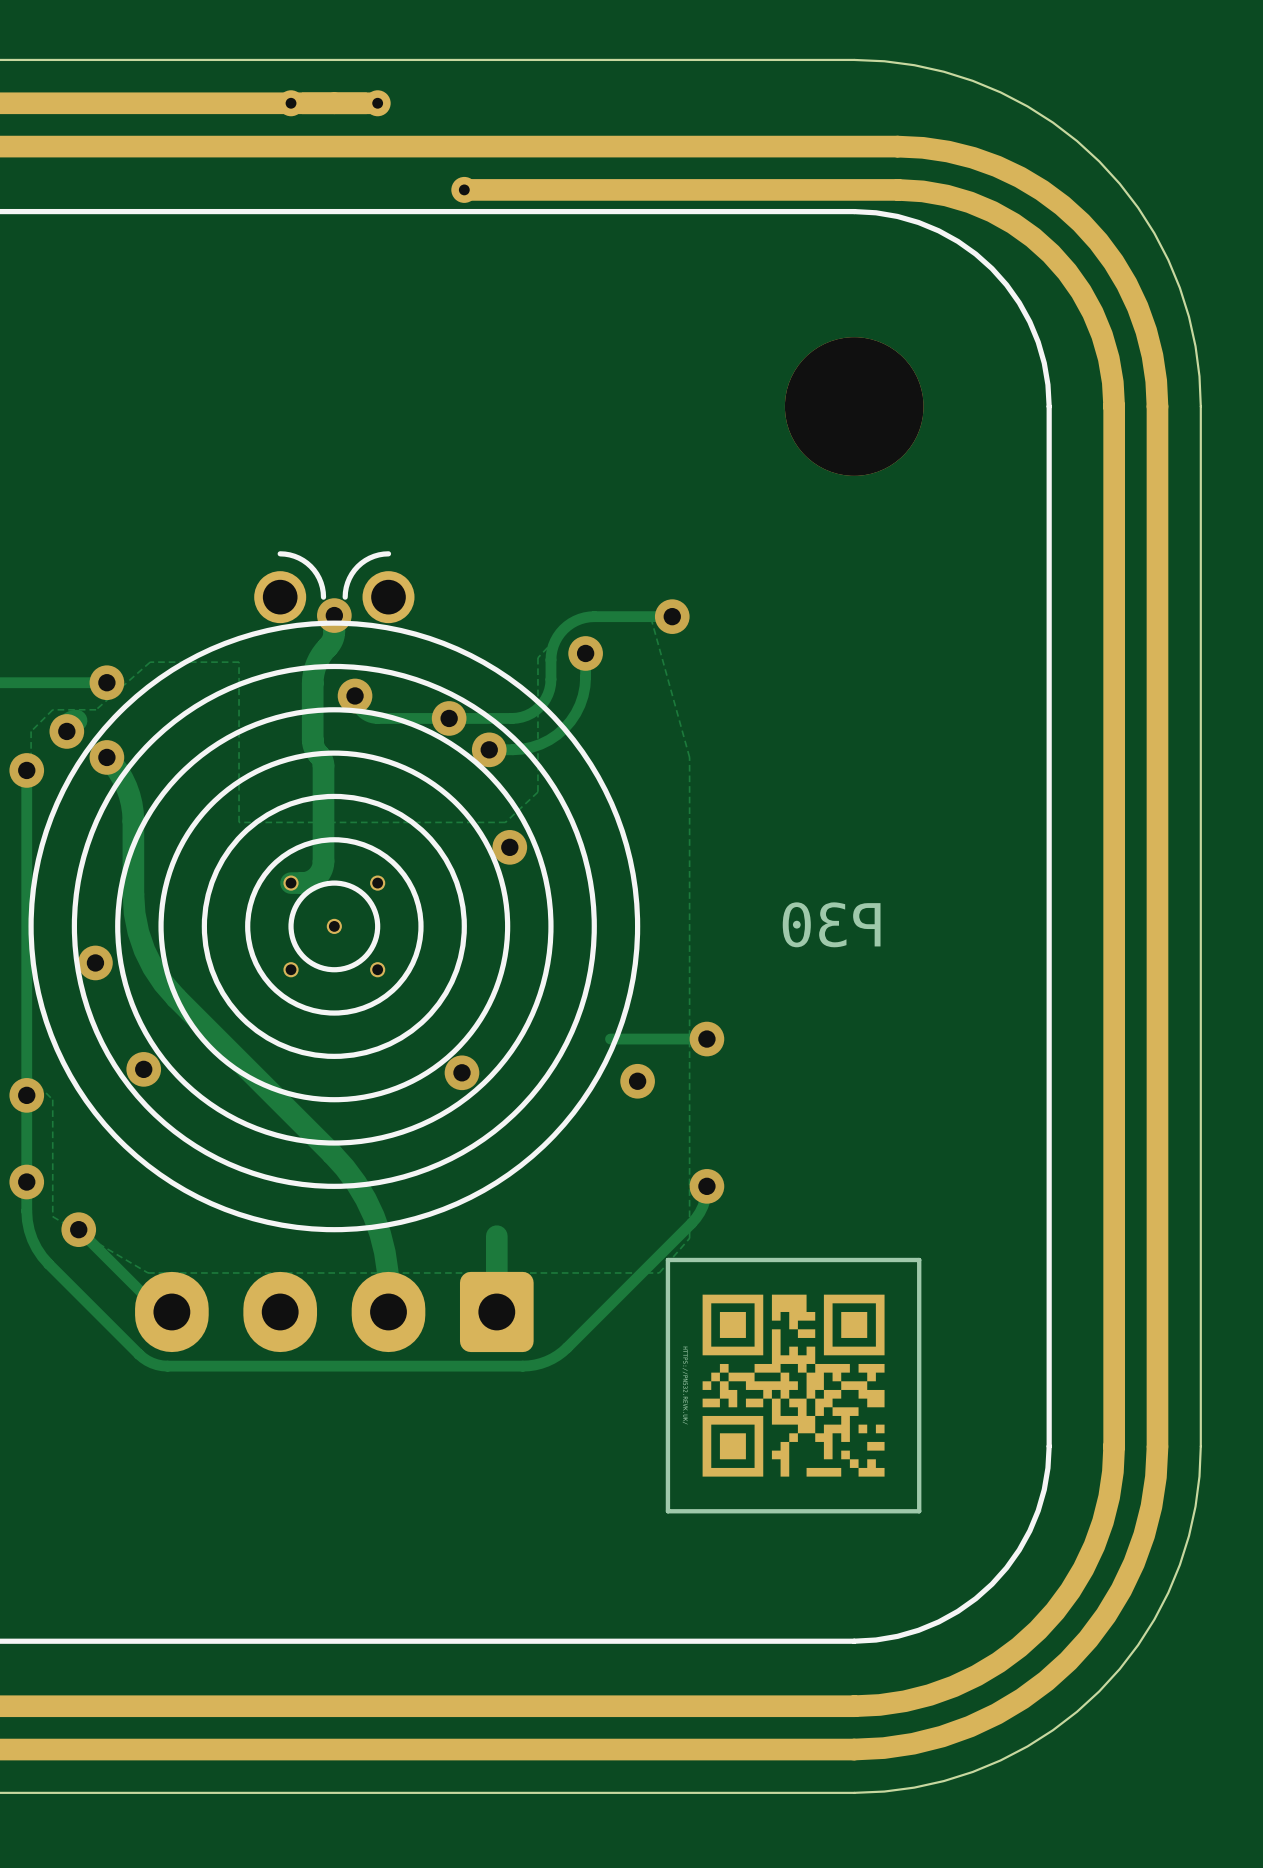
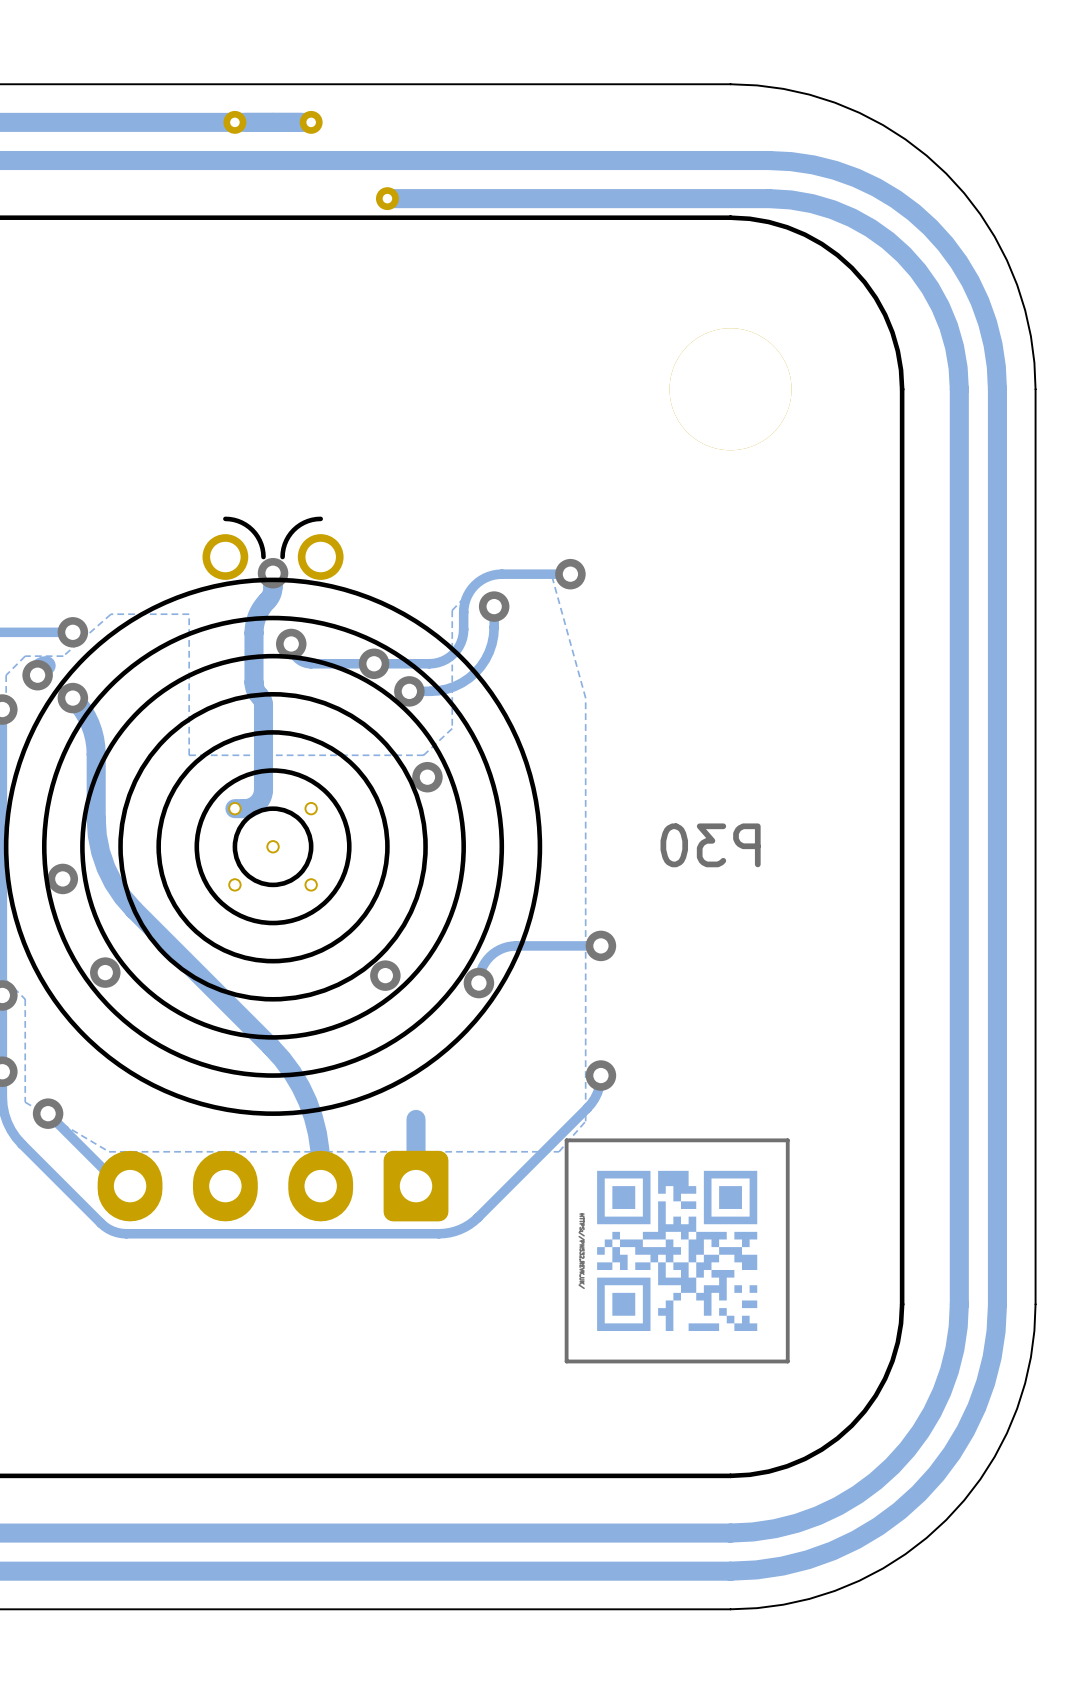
track: none -> (516, 945) (499, 949) (489, 956) (481, 970) (478, 983)
via position: (637, 1081) -> (478, 983)

